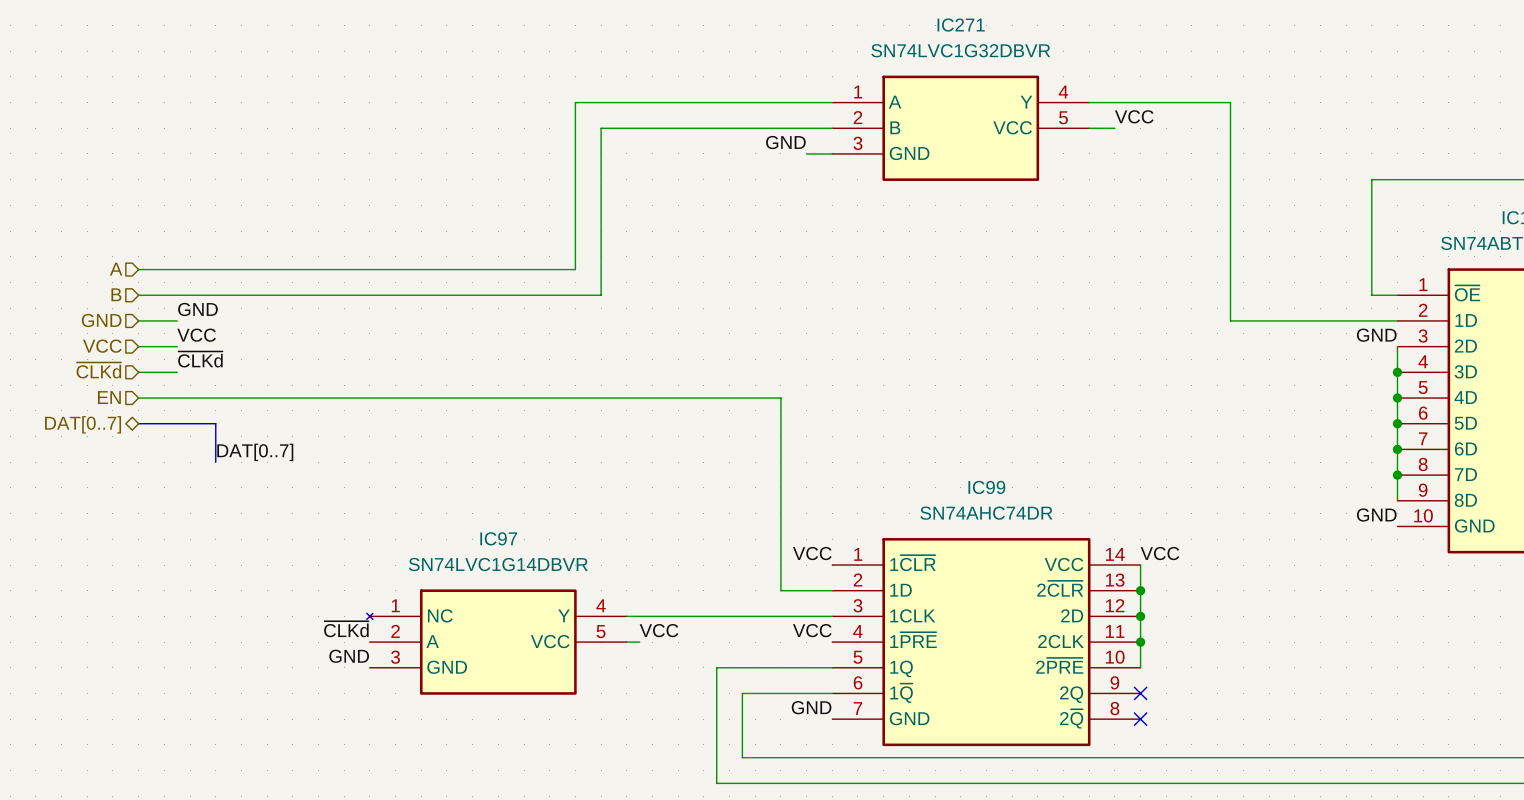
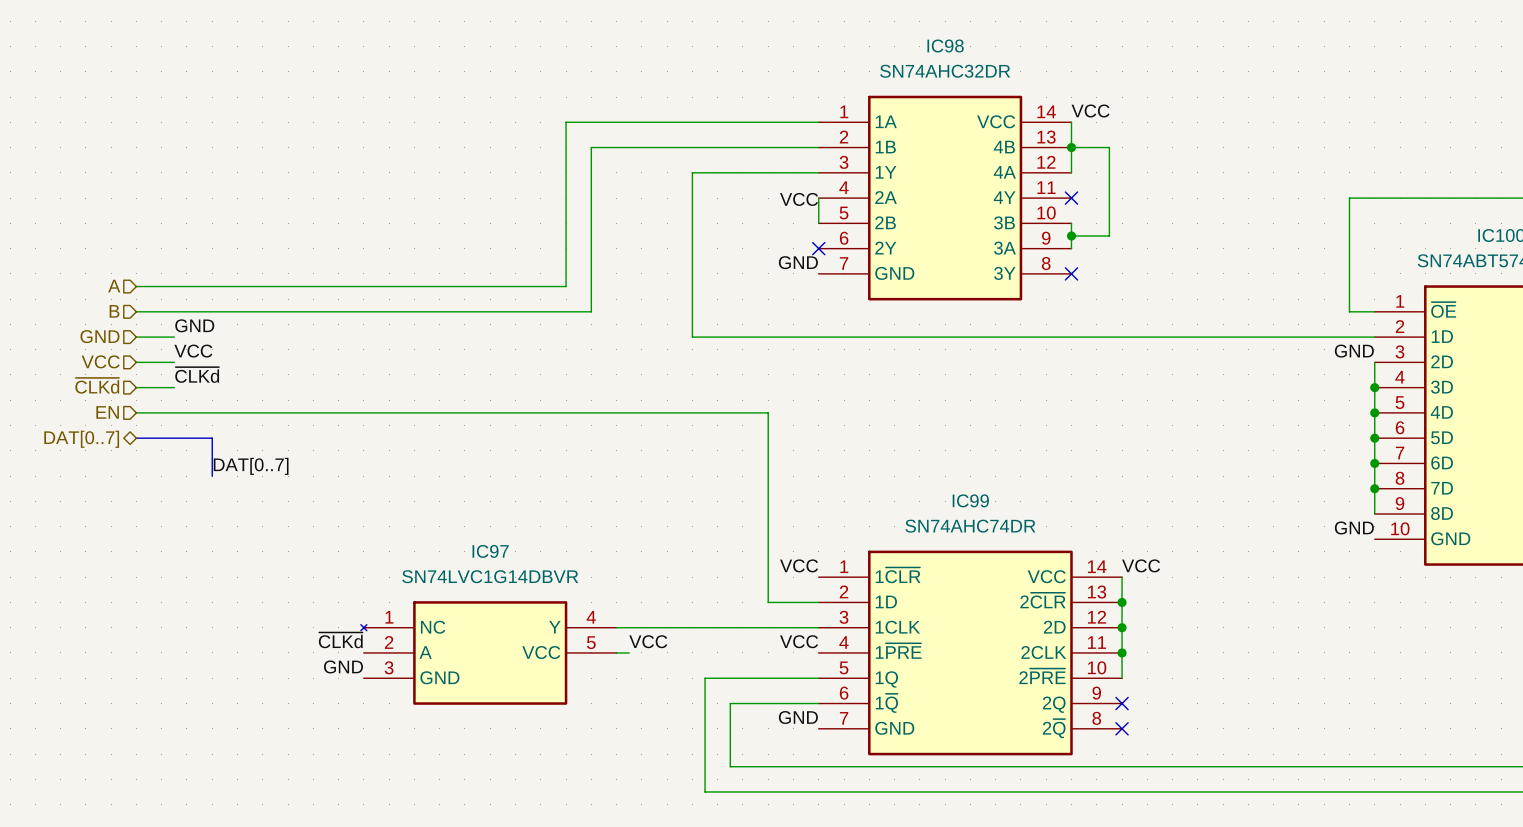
wire: (1089, 102) (1230, 102) (1230, 320) -> (1071, 122) (1071, 172)
label position: VCC (1134, 116) -> VCC (1090, 110)
IC271: SN74LVC1G32DBVR (960, 128) -> none
junction: none -> (1071, 147)
wire: none -> (1096, 147) (1109, 147) (1109, 236) (1071, 236)
label position: GND (785, 142) -> GND (798, 262)
wire: none -> (793, 172) (692, 172) (692, 337) (1210, 337)
wire: none -> (818, 198) (818, 223)
IC98: none -> SN74AHC32DR (945, 198)
no-connect mark: none -> (1071, 198)
label: none -> VCC (799, 199)
wire: none -> (1071, 223) (1071, 248)
junction: none -> (1071, 236)
no-connect mark: none -> (818, 248)
no-connect mark: none -> (1071, 273)

